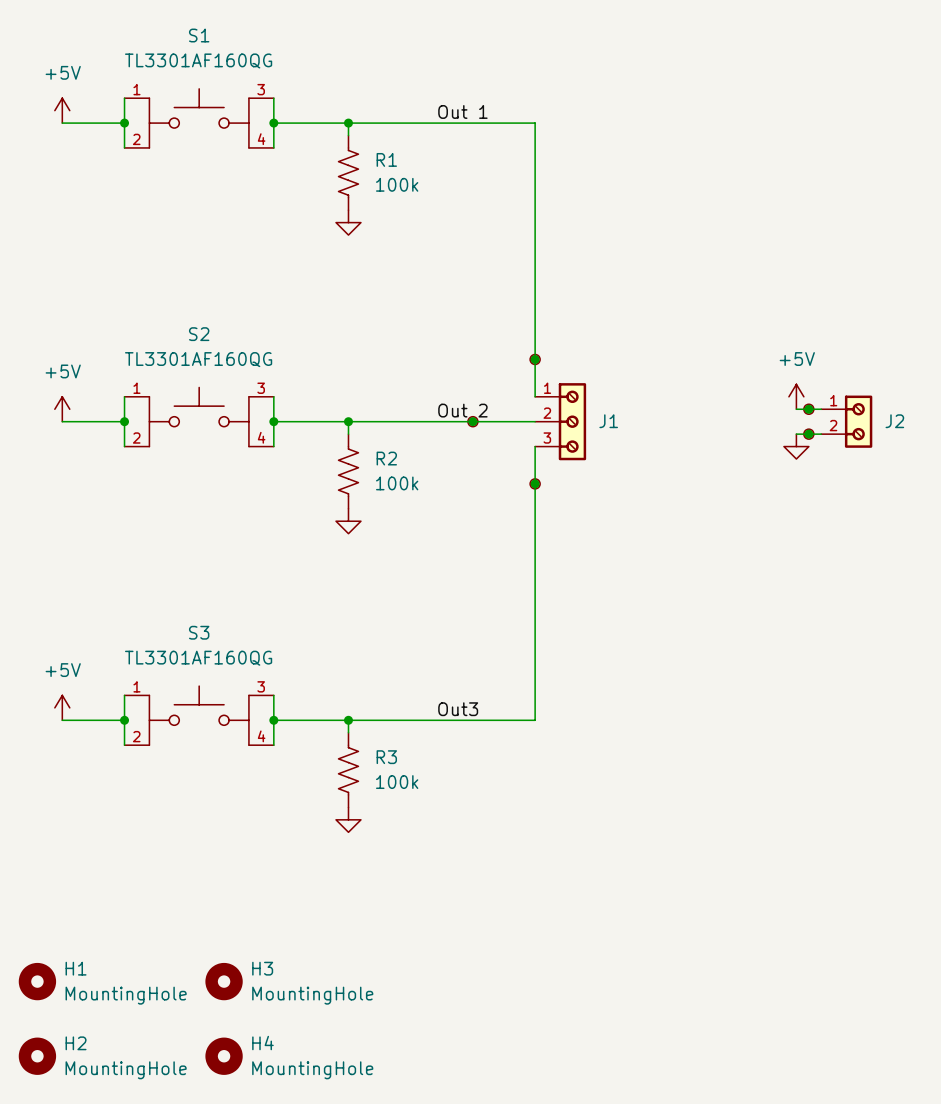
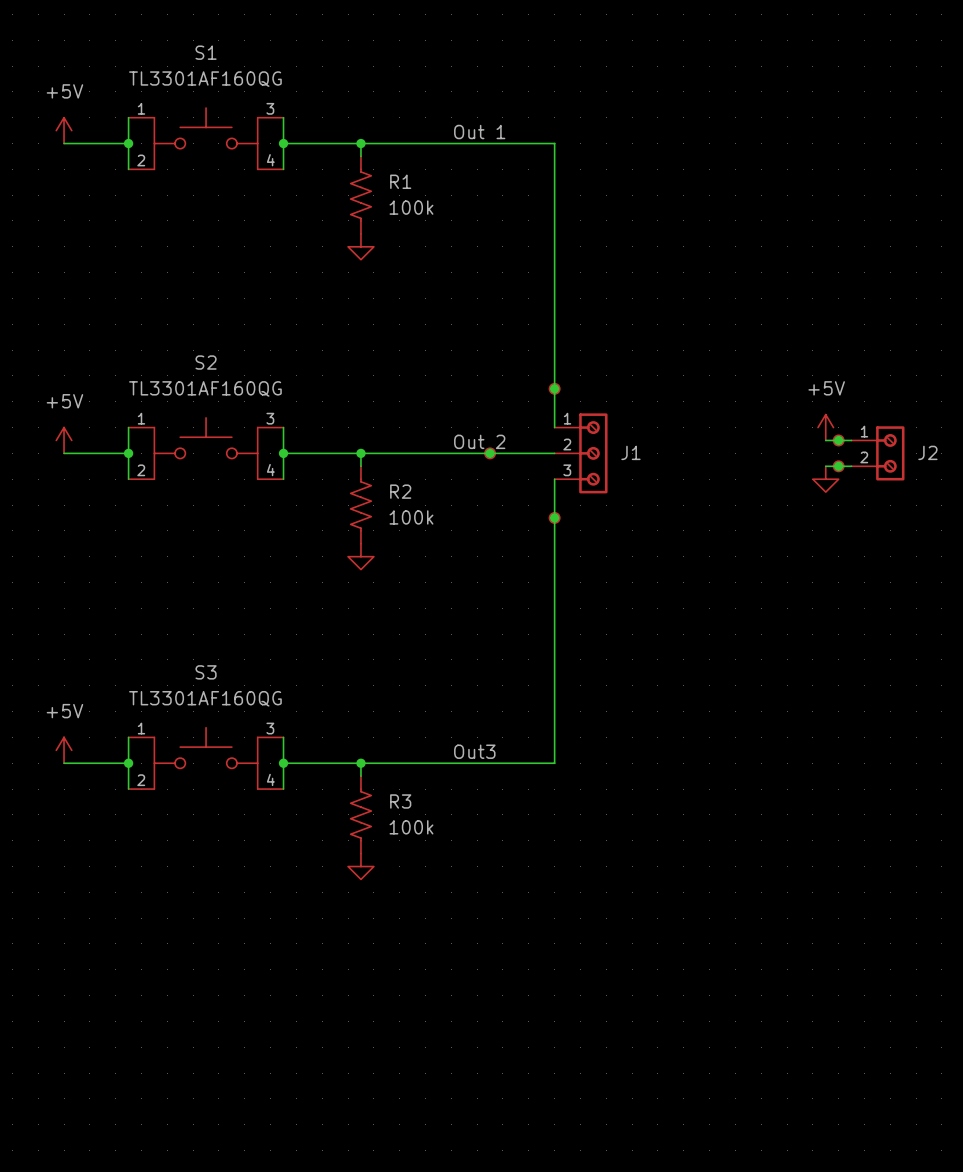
H1: MountingHole (37, 981) -> none
H3: MountingHole (224, 981) -> none
H2: MountingHole (37, 1056) -> none
H4: MountingHole (224, 1056) -> none

